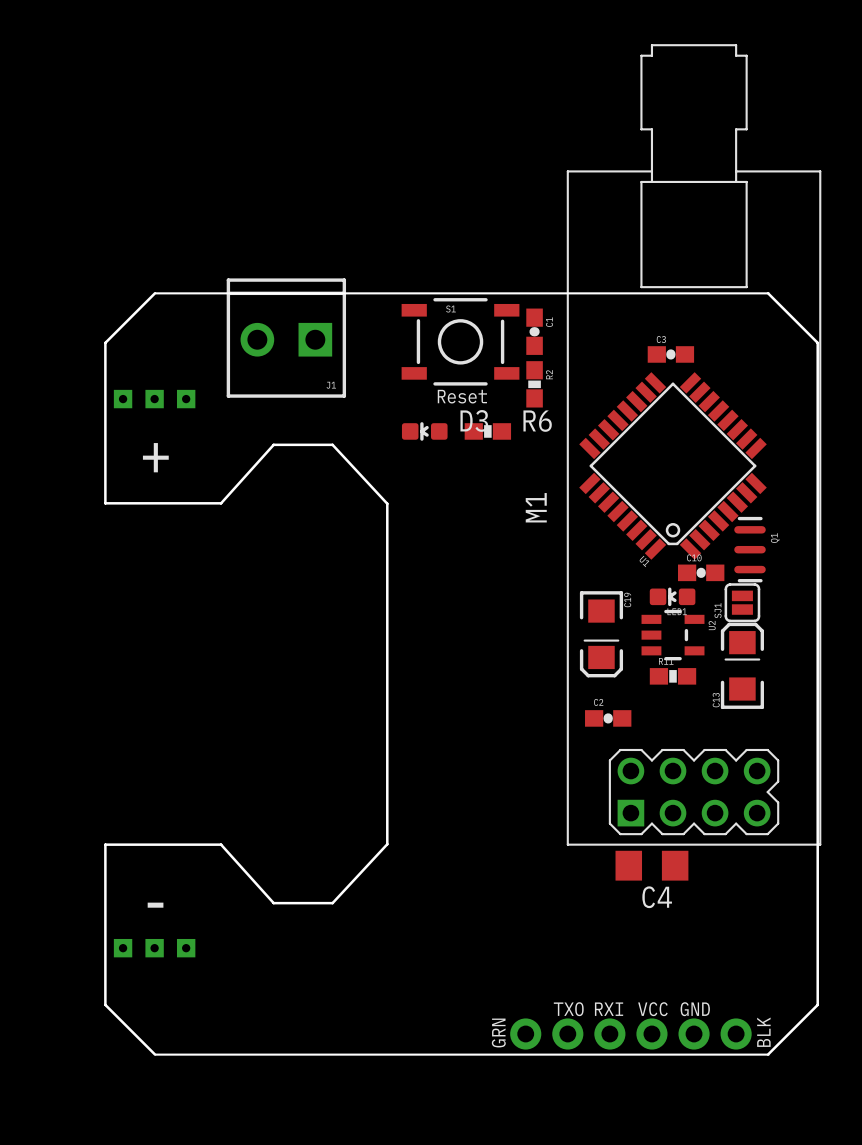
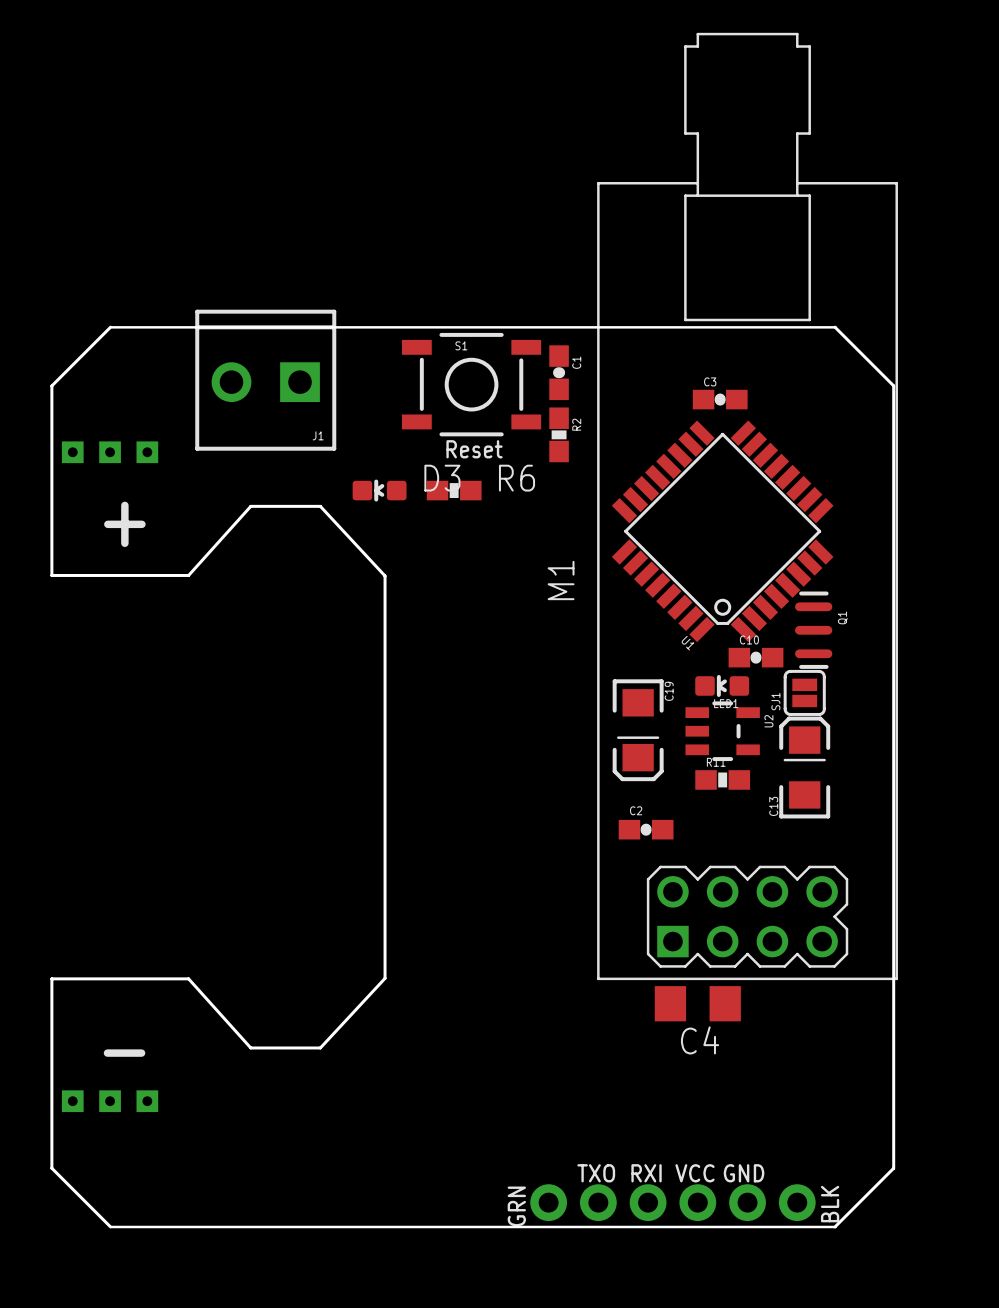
D3 position: (424, 431) -> (379, 490)
R6 position: (487, 431) -> (454, 490)

